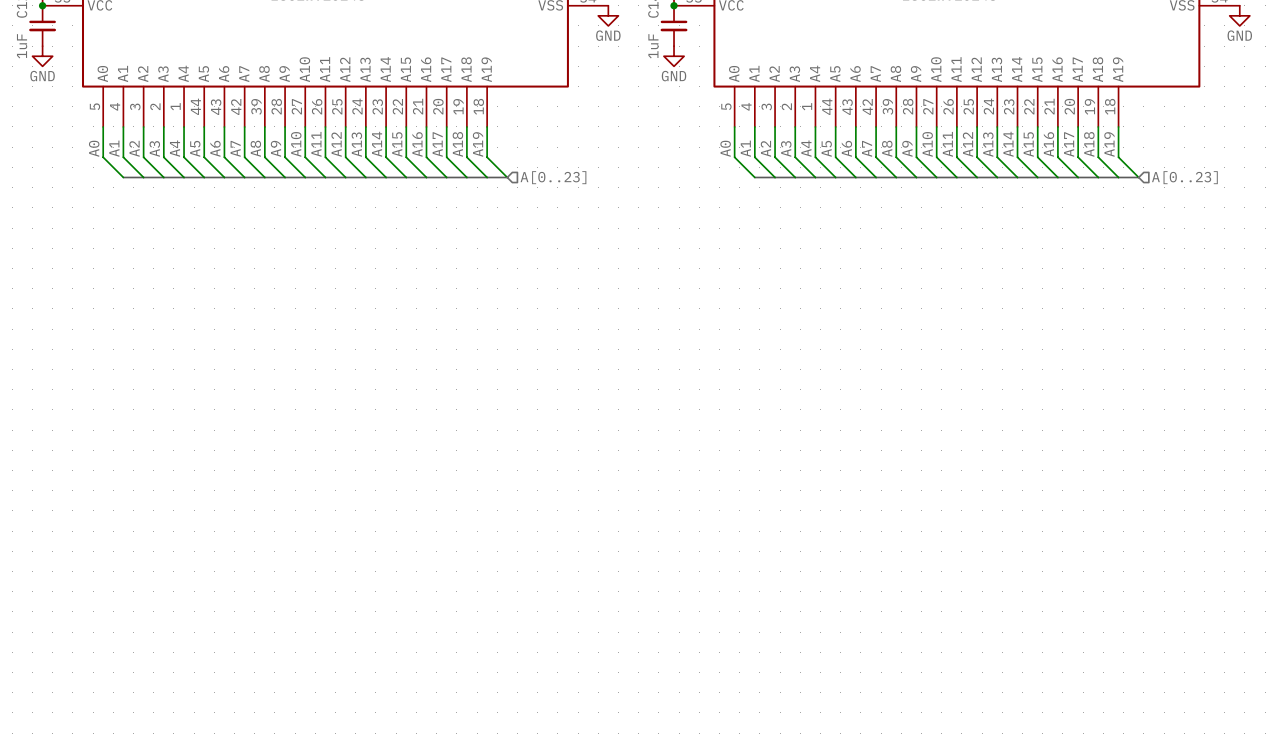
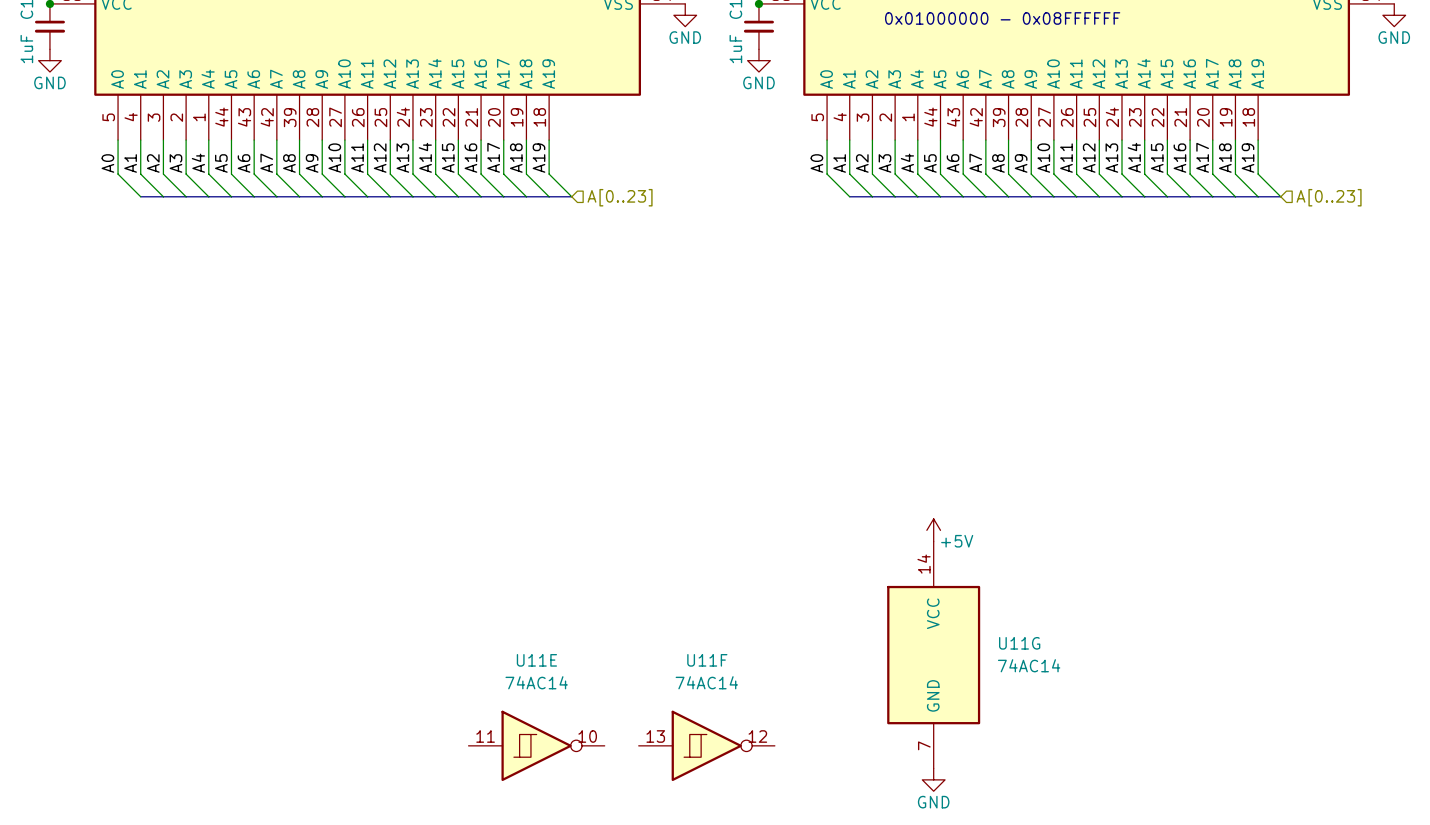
text: none -> 0x01000000 - 0x08FFFFFF (1002, 18)
power symbol: none -> +5V (933, 530)
U11G: none -> 74AC14 (933, 655)
U11E: none -> 74AC14 (536, 745)
U11F: none -> 74AC14 (706, 745)
power symbol: none -> GND (933, 779)

